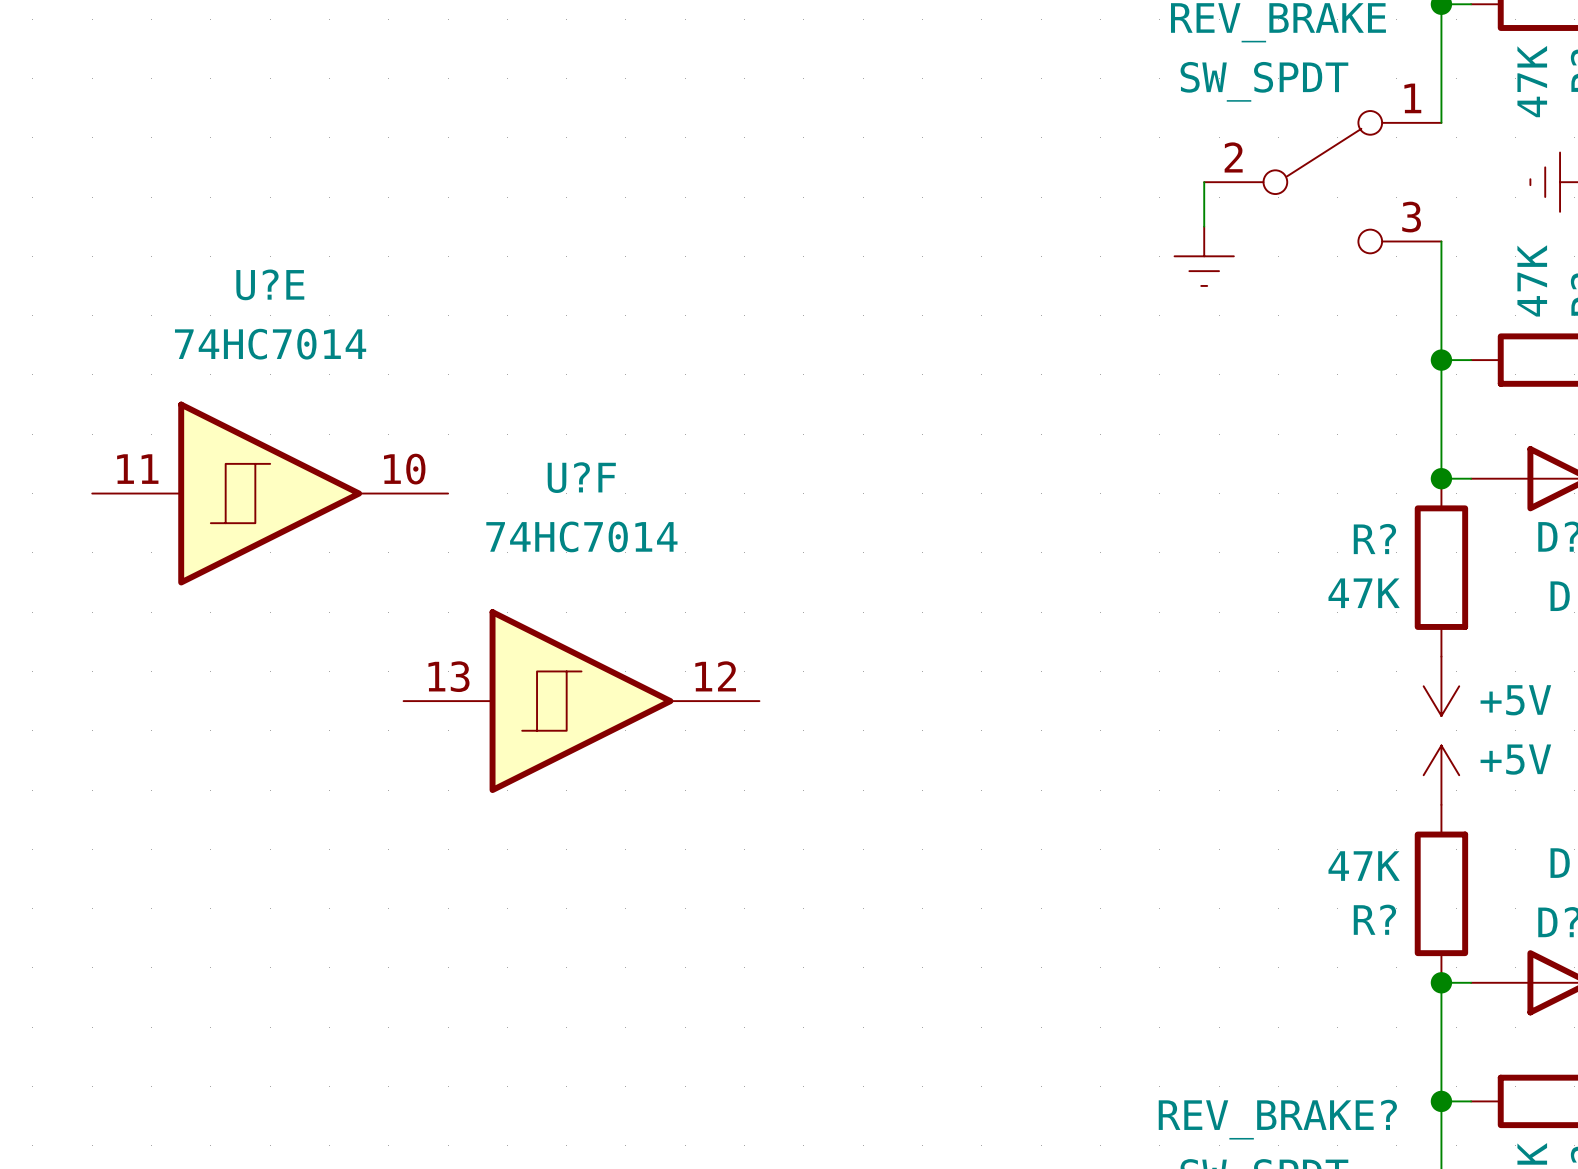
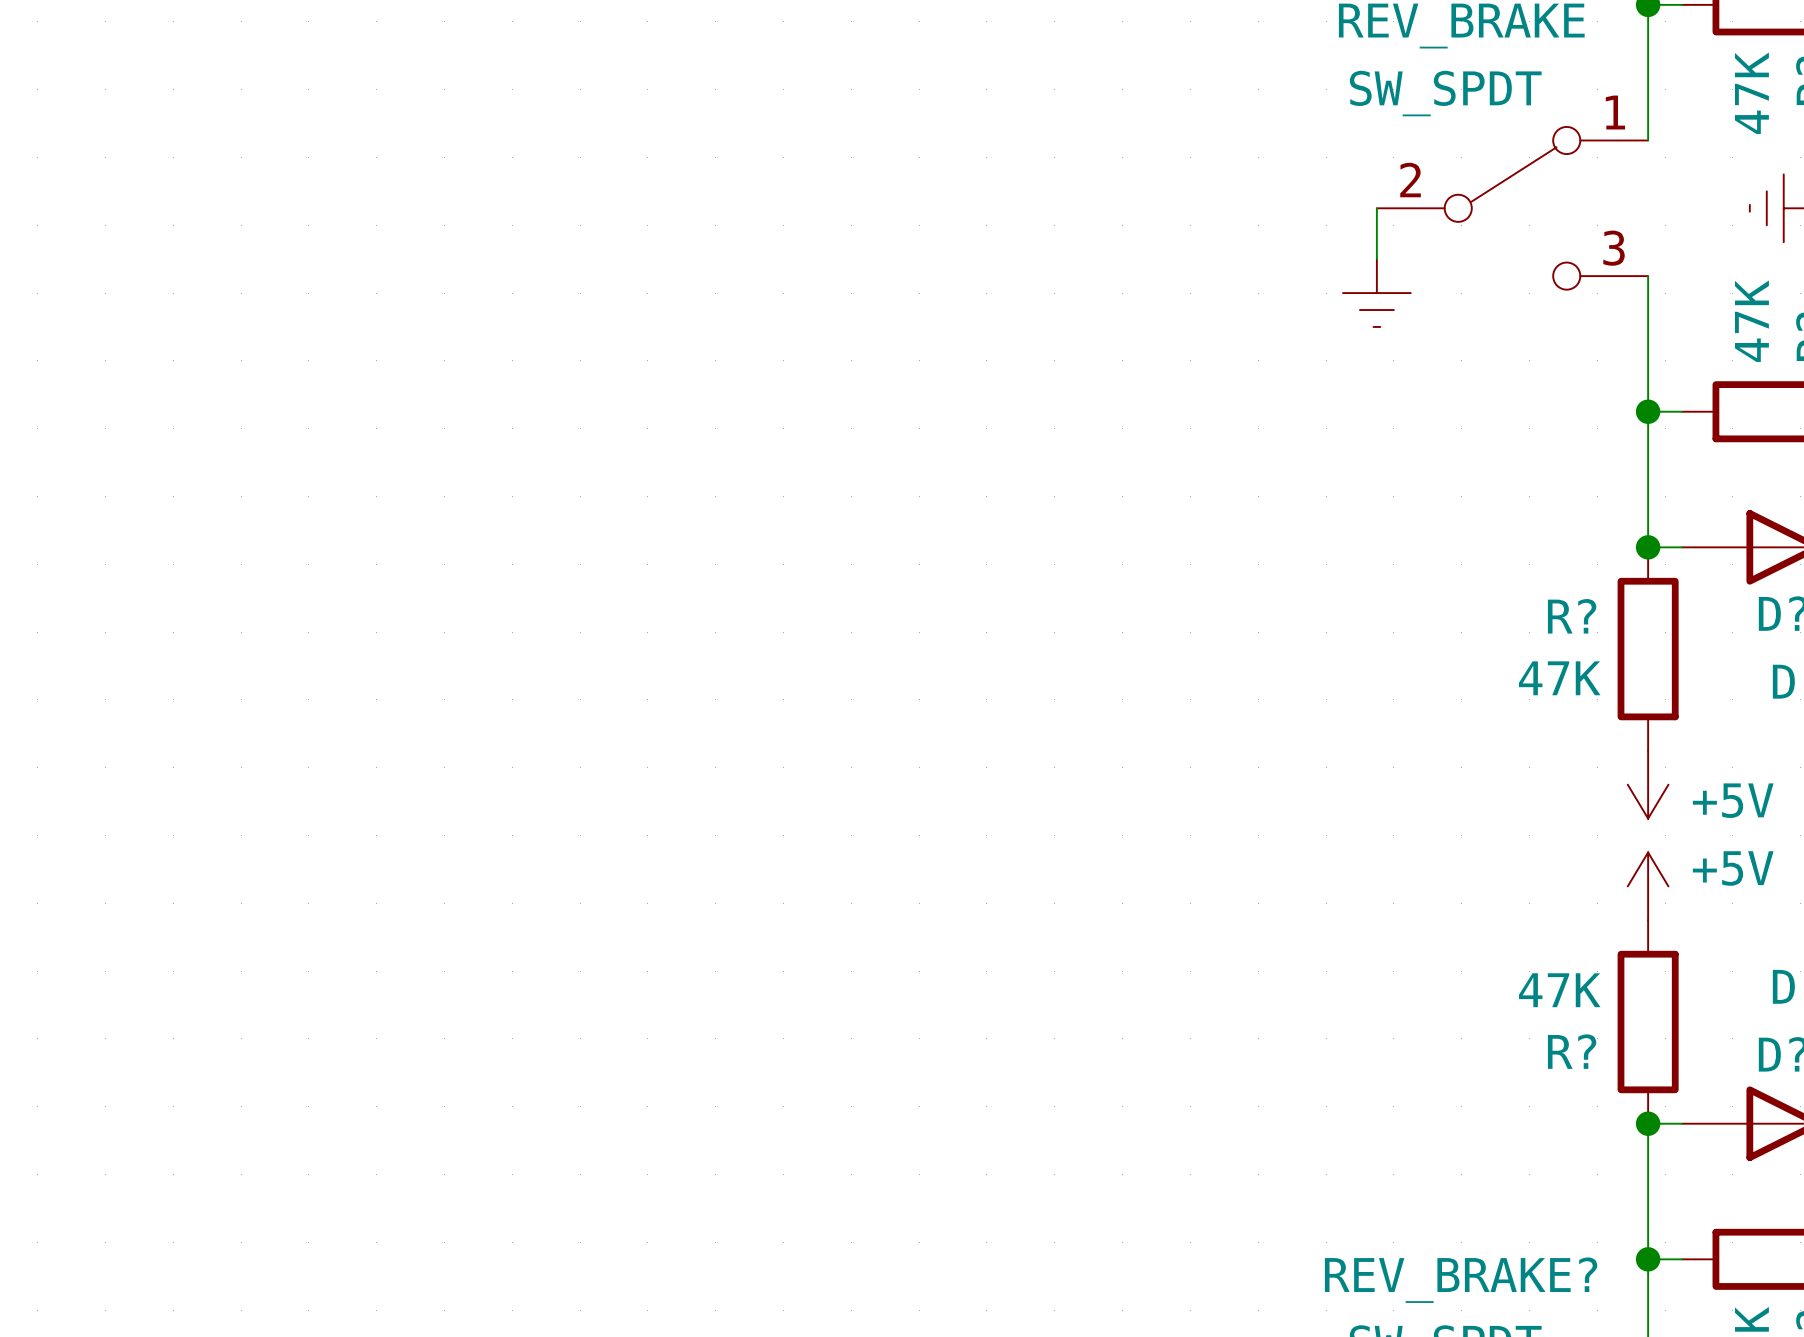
U?E: 74HC7014 (270, 493) -> none
U?F: 74HC7014 (581, 701) -> none

